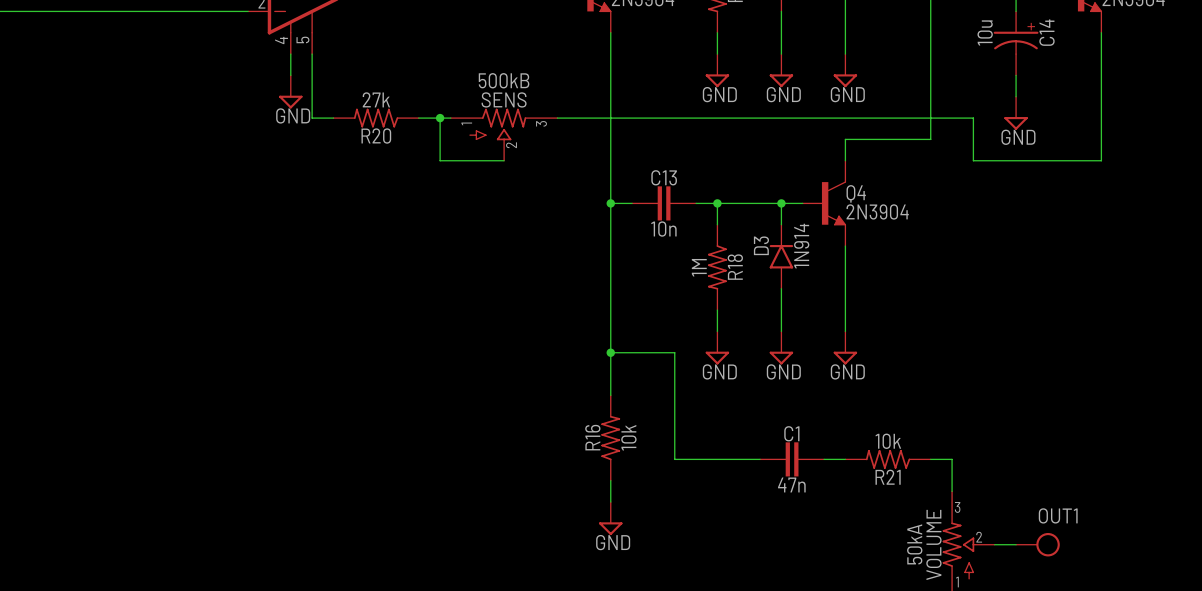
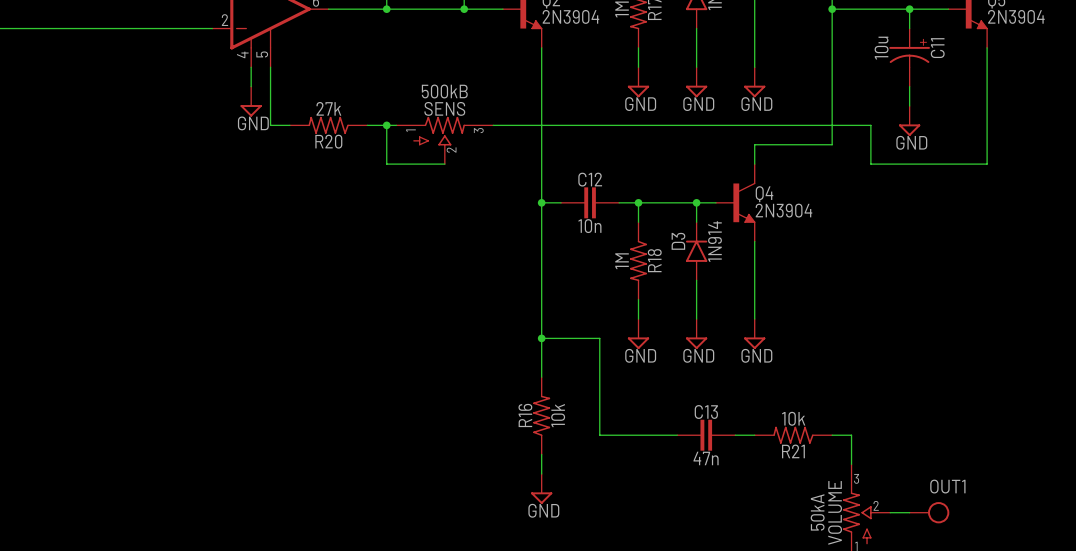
C14 name: C14 (1047, 32) -> C11 (937, 48)
C13 name: C13 (664, 177) -> C12 (590, 179)
C1 name: C1 (791, 433) -> C13 (706, 412)

